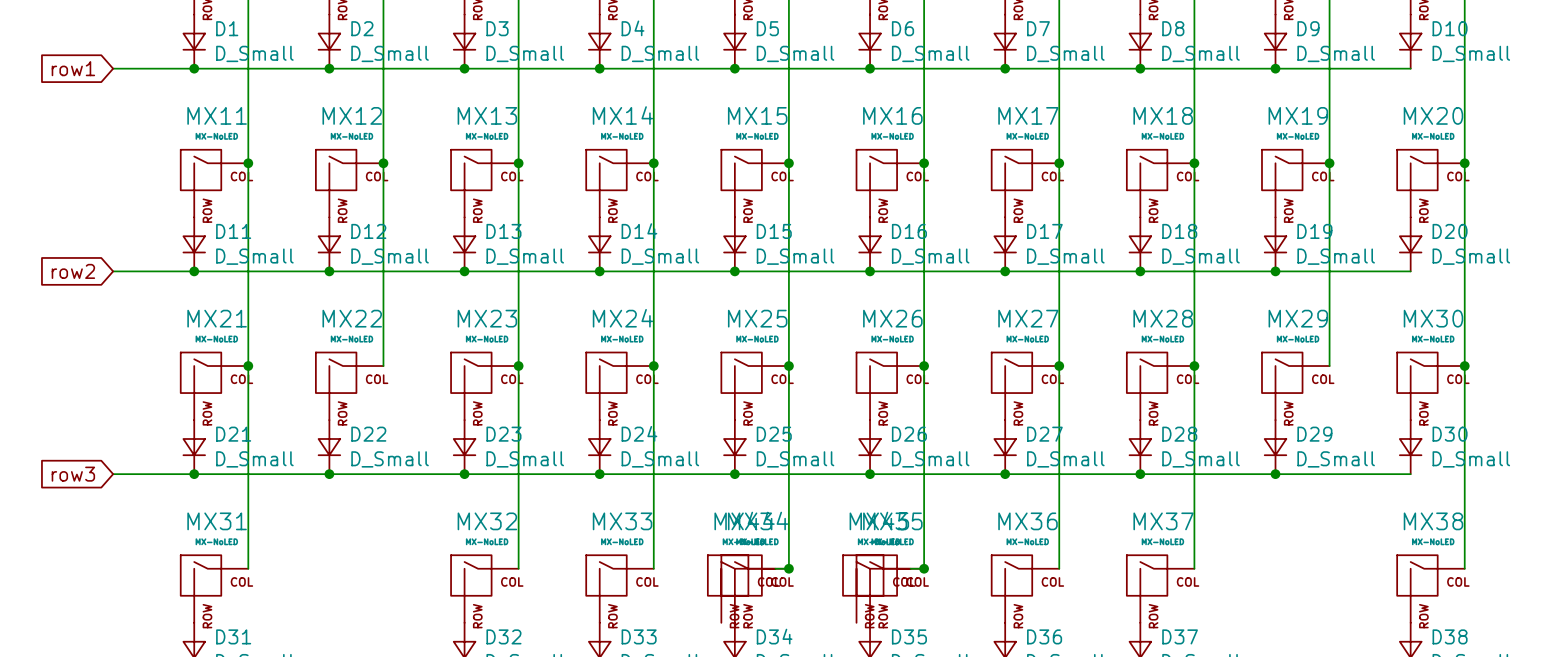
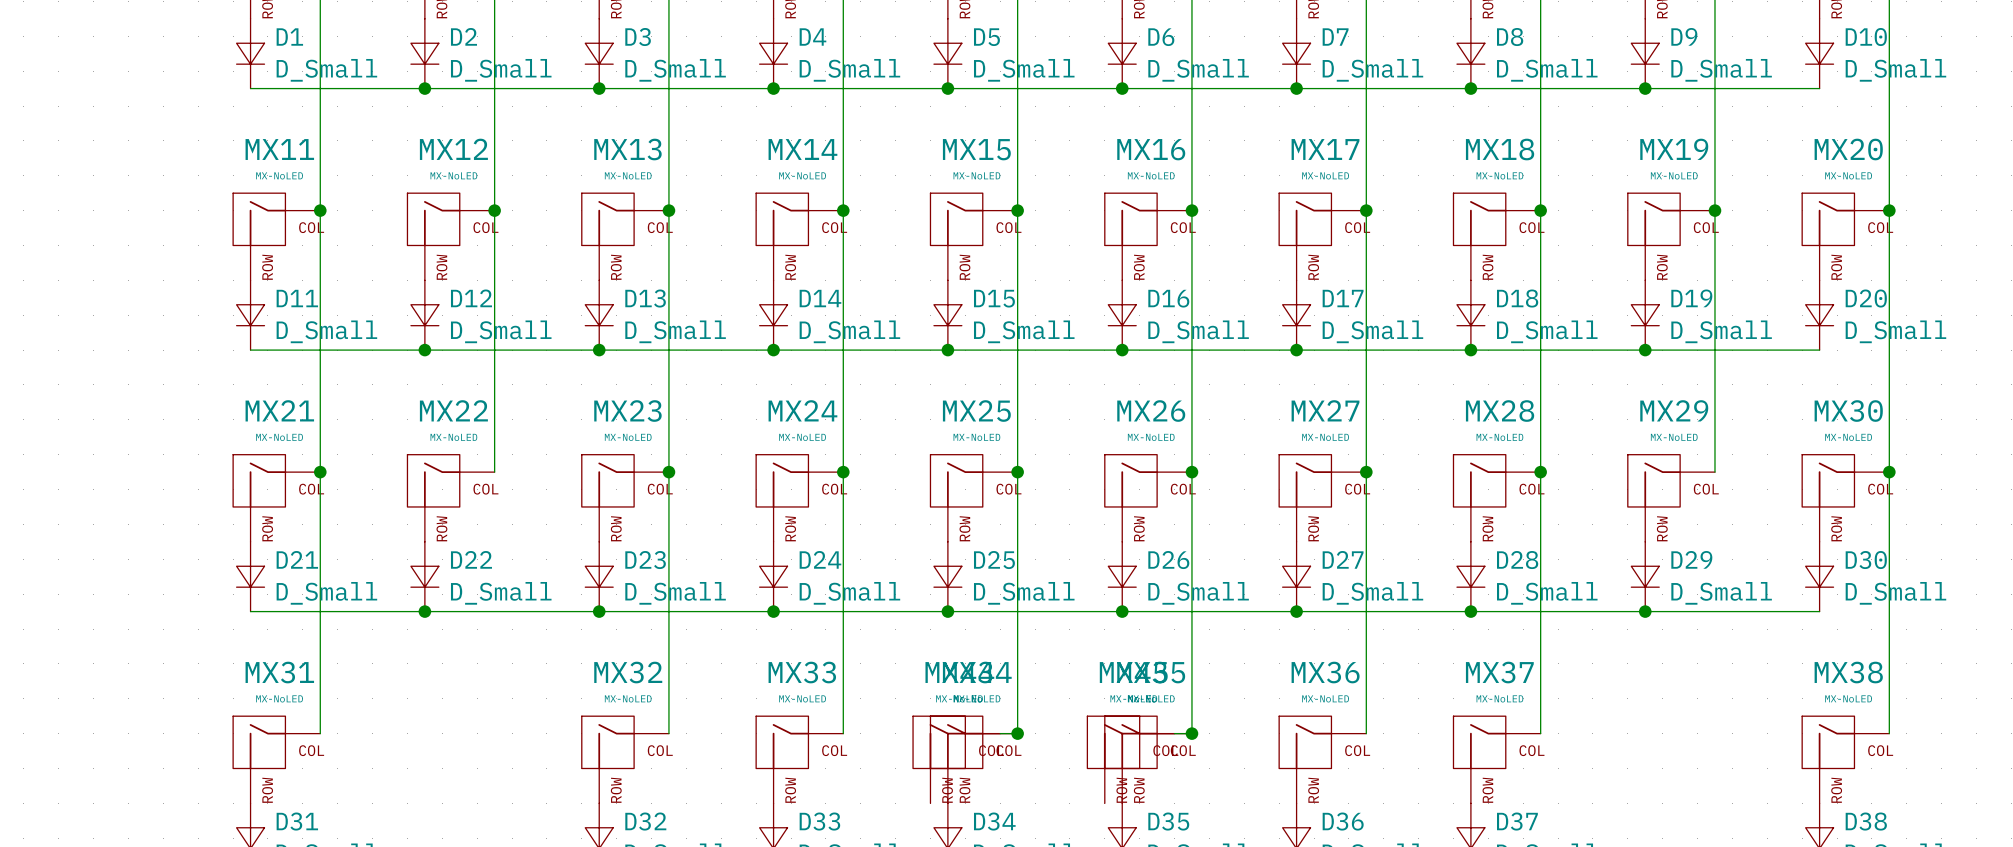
global label: row1 (73, 68) -> none
wire: (113, 68) (194, 68) -> none
junction: (194, 68) -> none
global label: row2 (73, 271) -> none
wire: (113, 271) (194, 271) -> none
junction: (194, 271) -> none
global label: row3 (73, 474) -> none
wire: (113, 474) (194, 474) -> none
junction: (194, 474) -> none

